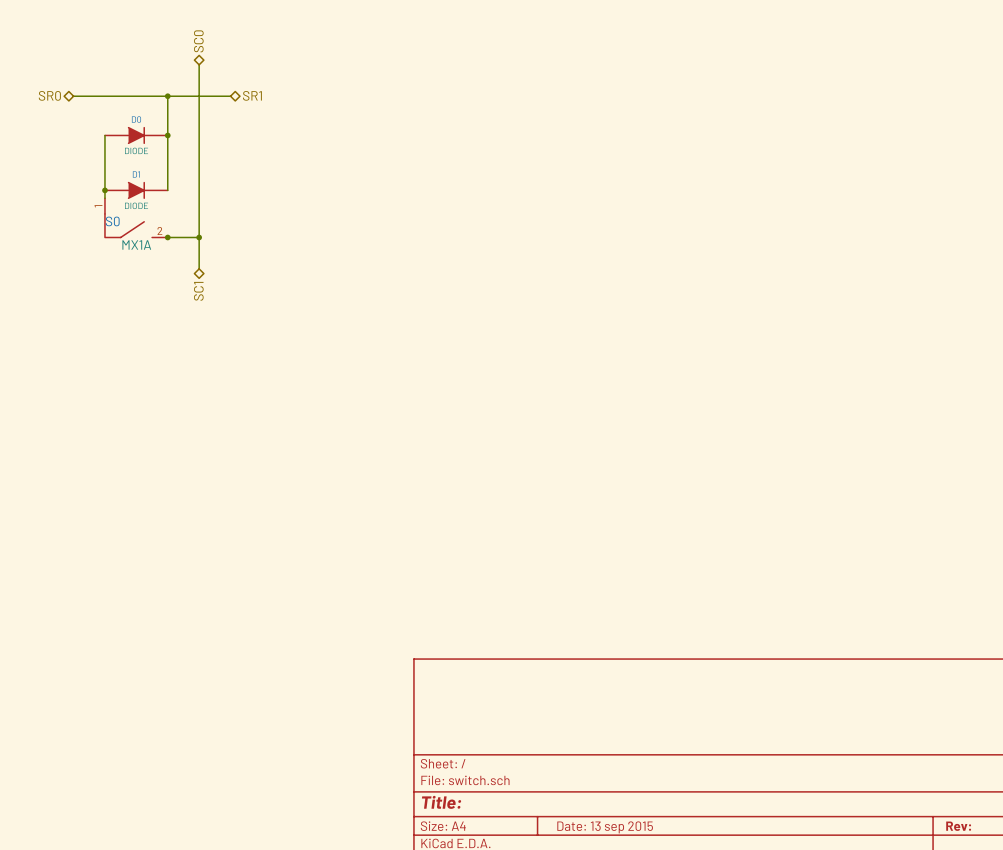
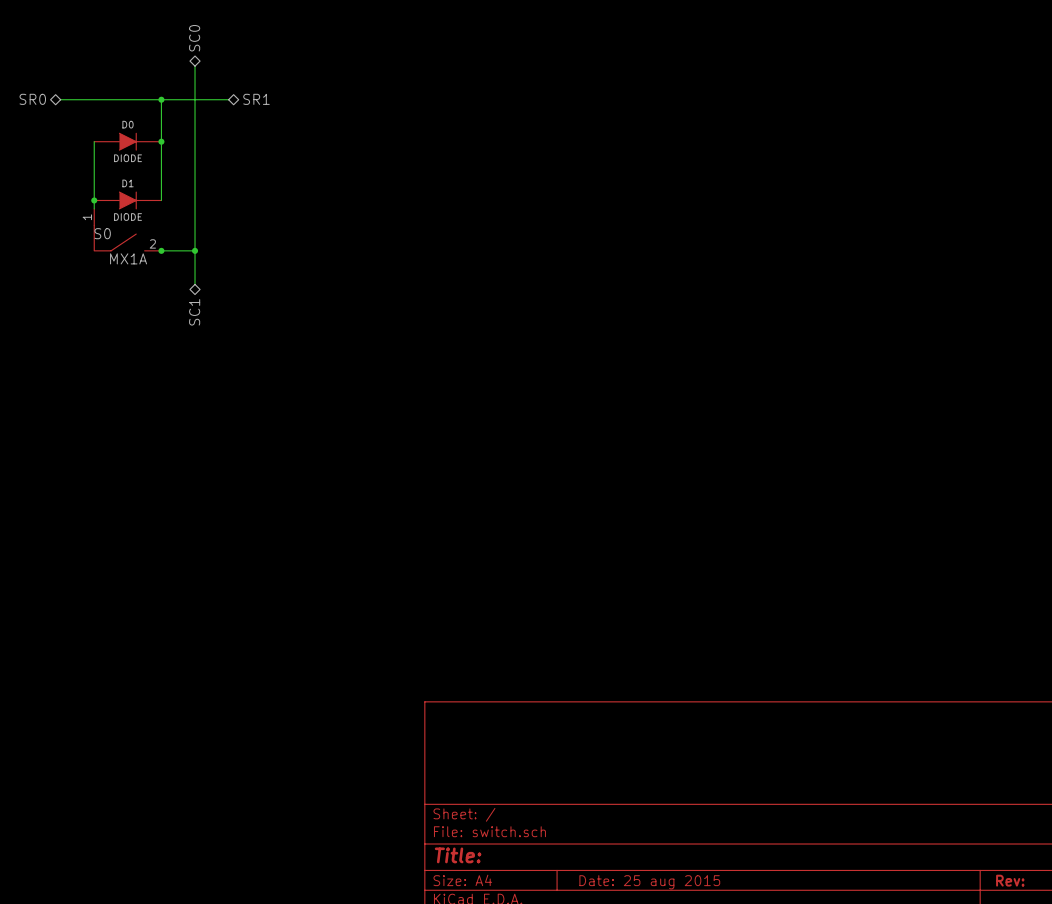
title block: Date: 13 sep 2015 (605, 827) -> Date: 25 aug 2015 (649, 882)

